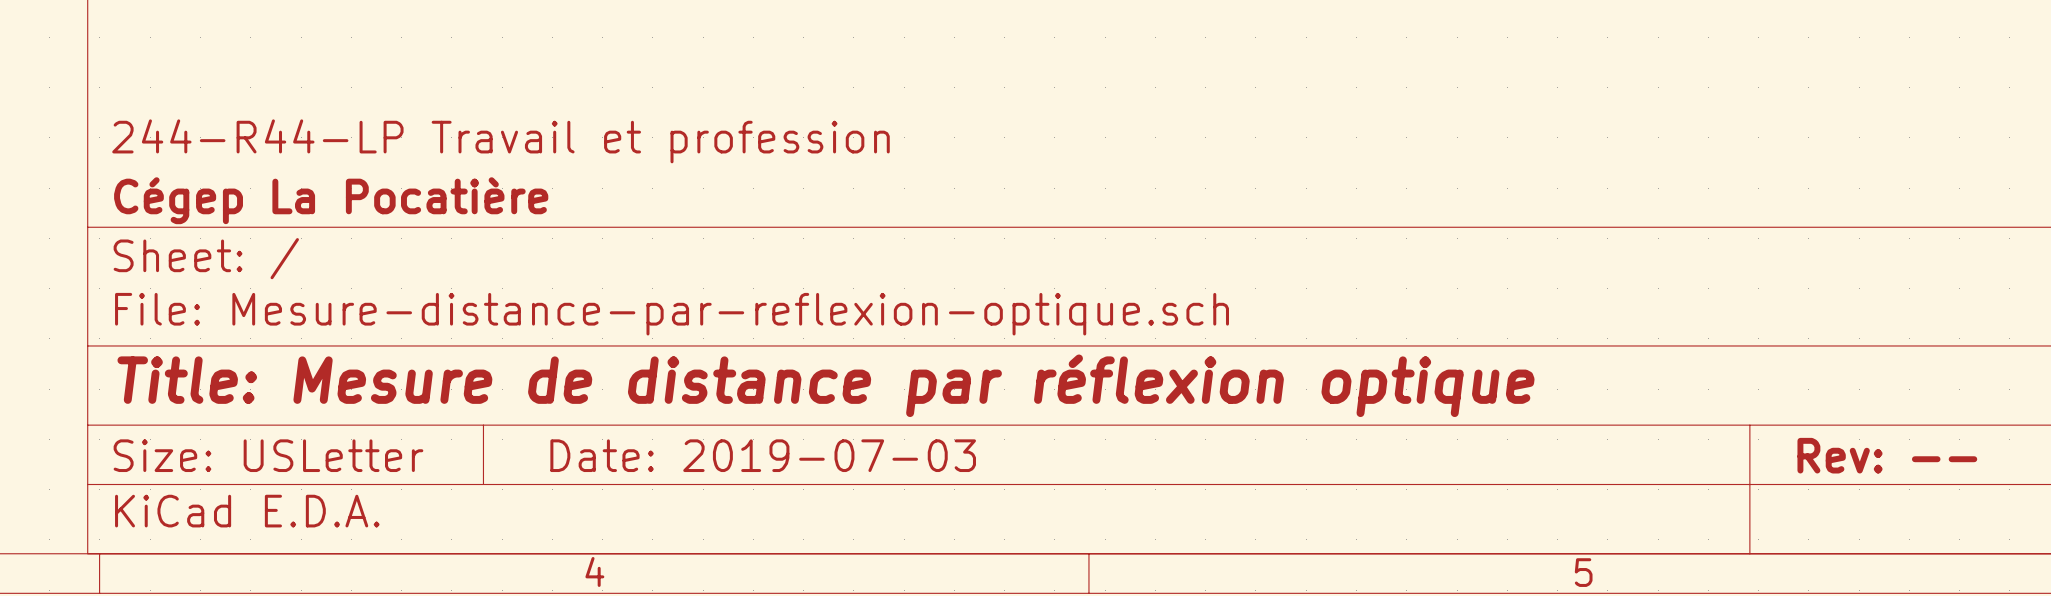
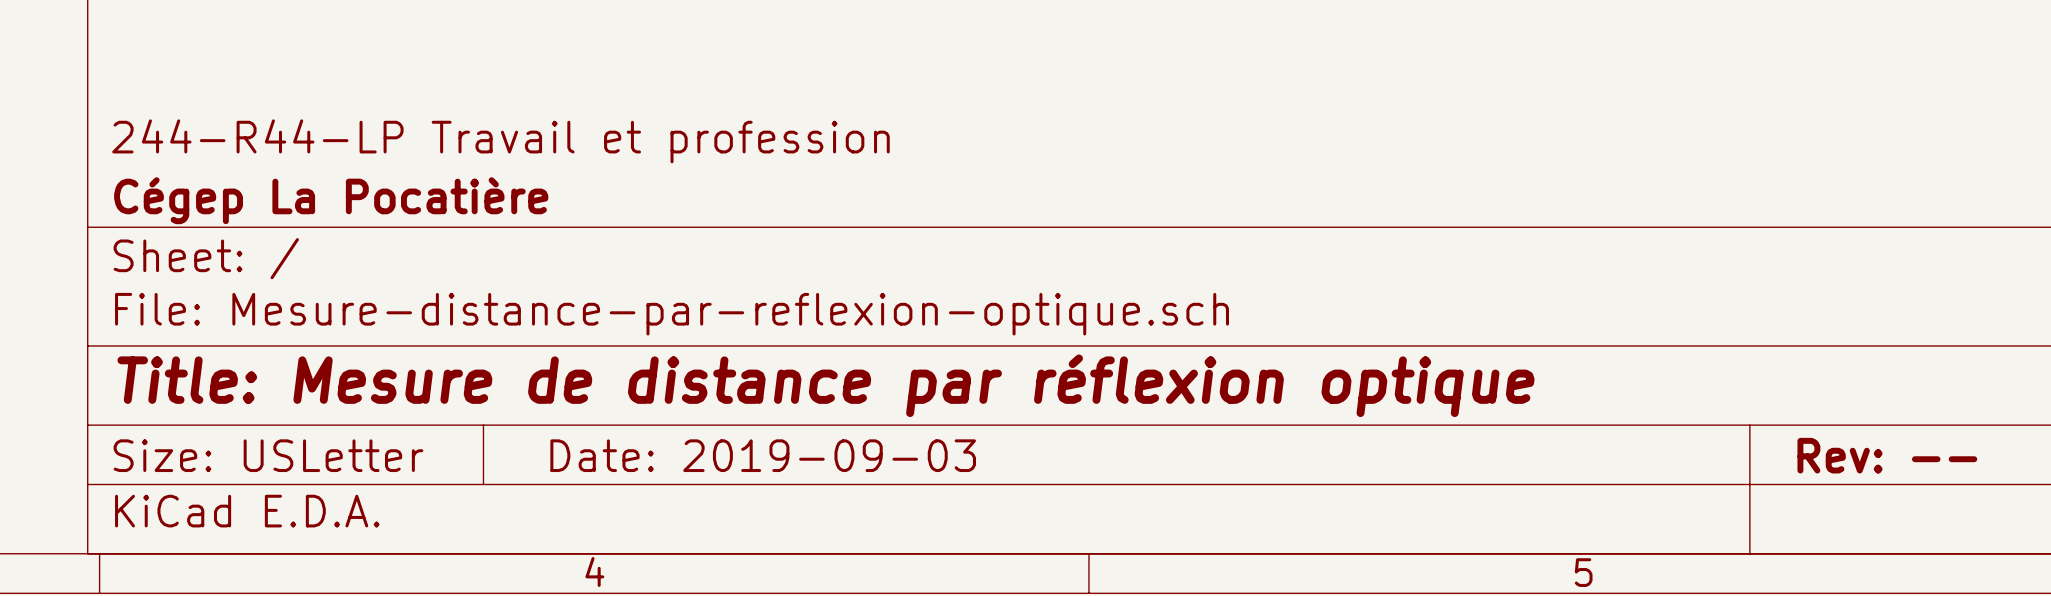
title block: Date: 2019-07-03 (763, 455) -> Date: 2019-09-03 (763, 455)

